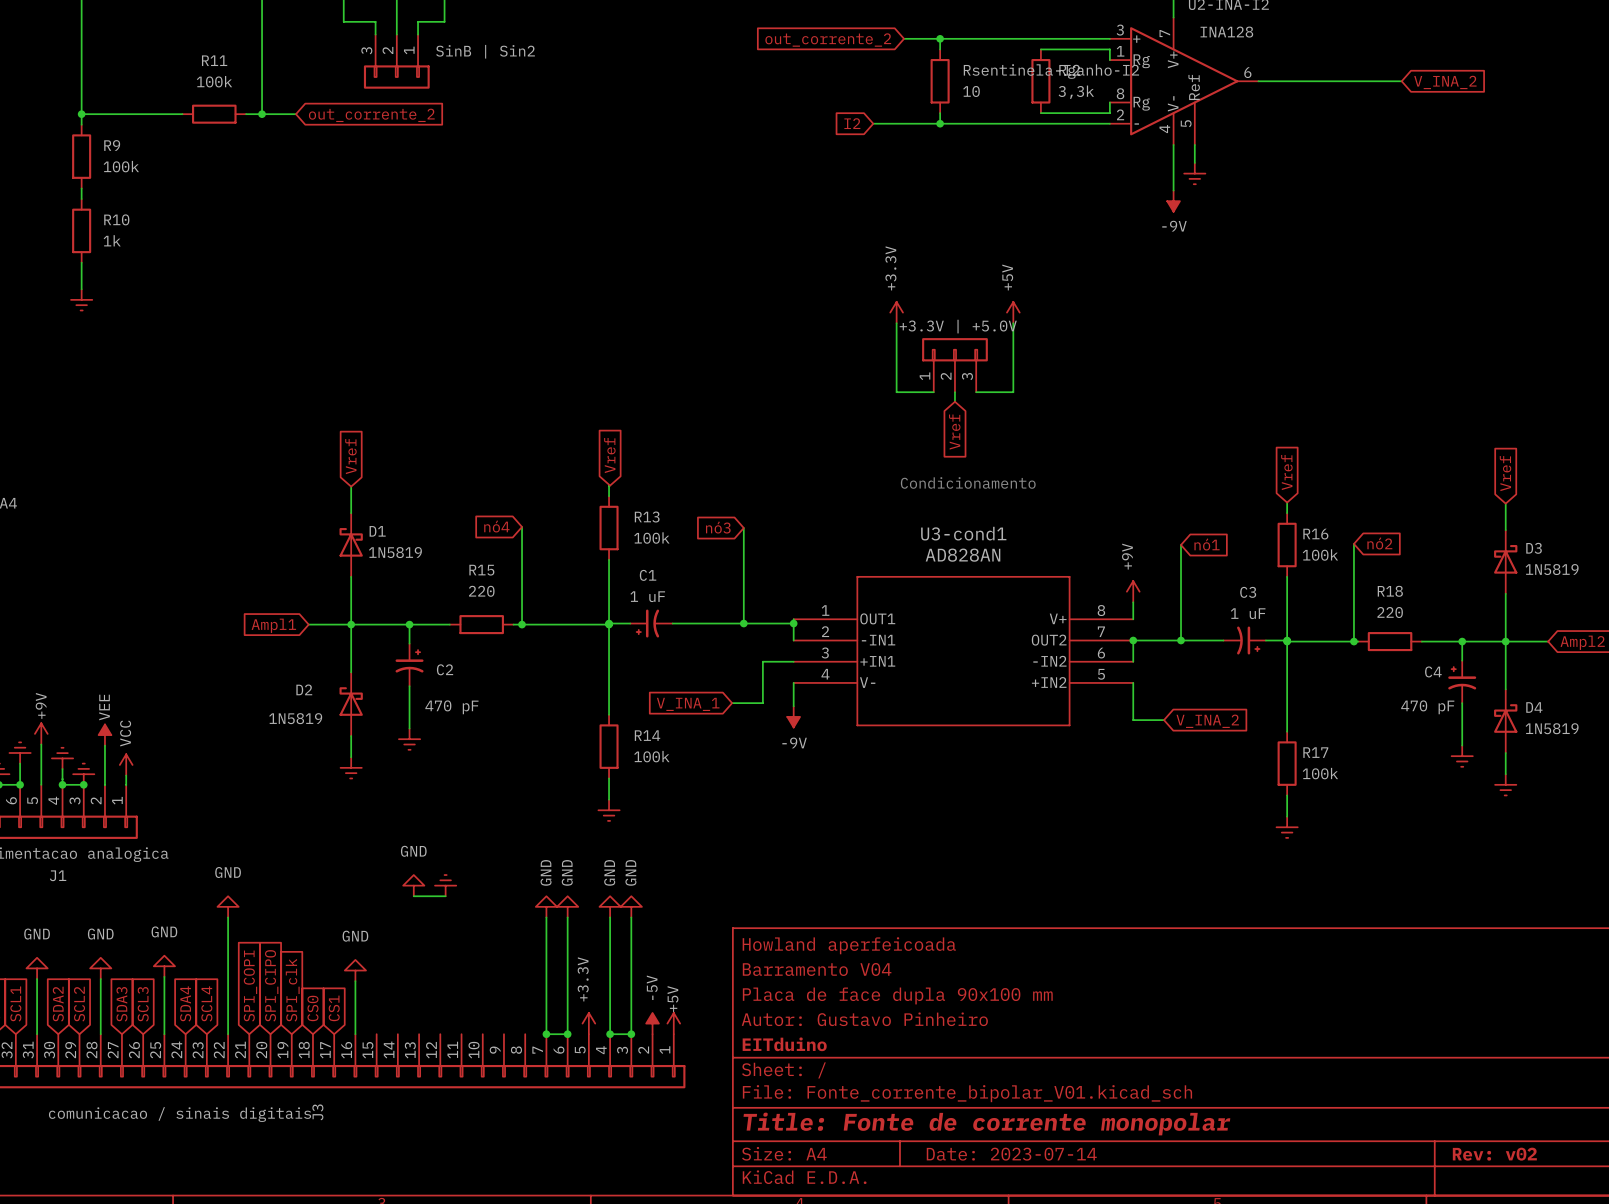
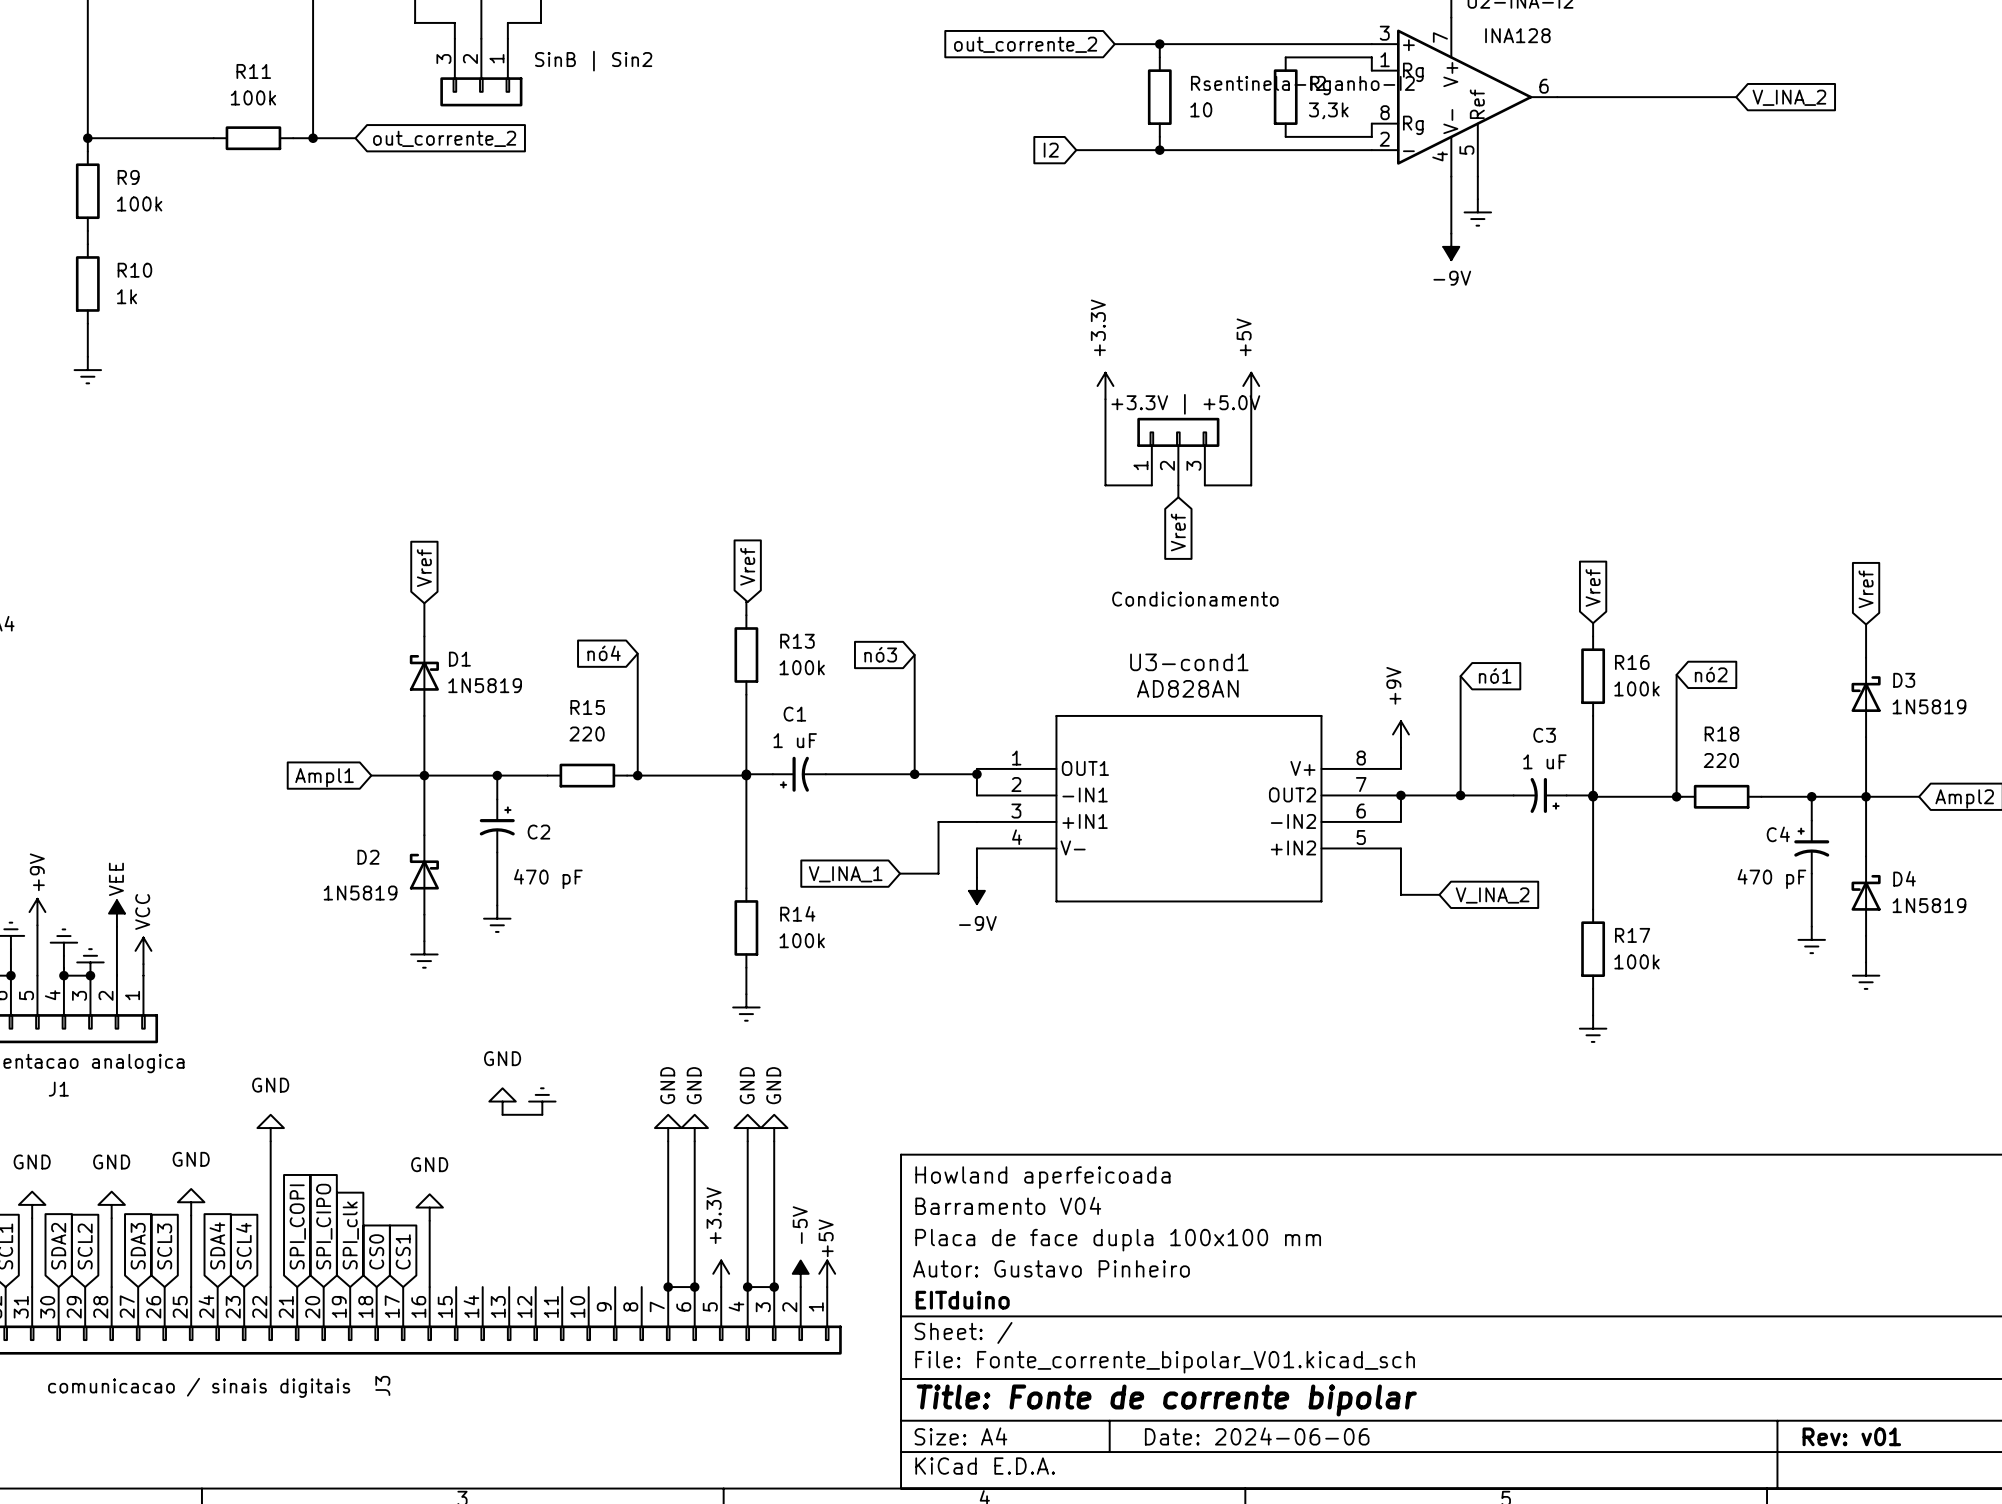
title block: Placa de face dupla 90x100 mm (897, 995) -> Placa de face dupla 100x100 mm (1118, 1240)
title block: Title: Fonte de corrente monopolar (986, 1124) -> Title: Fonte de corrente bipolar (1166, 1400)
title block: Date: 2023-07-14 (1011, 1154) -> Date: 2024-06-06 (1257, 1436)
title block: Rev: v02 (1494, 1154) -> Rev: v01 (1851, 1436)

